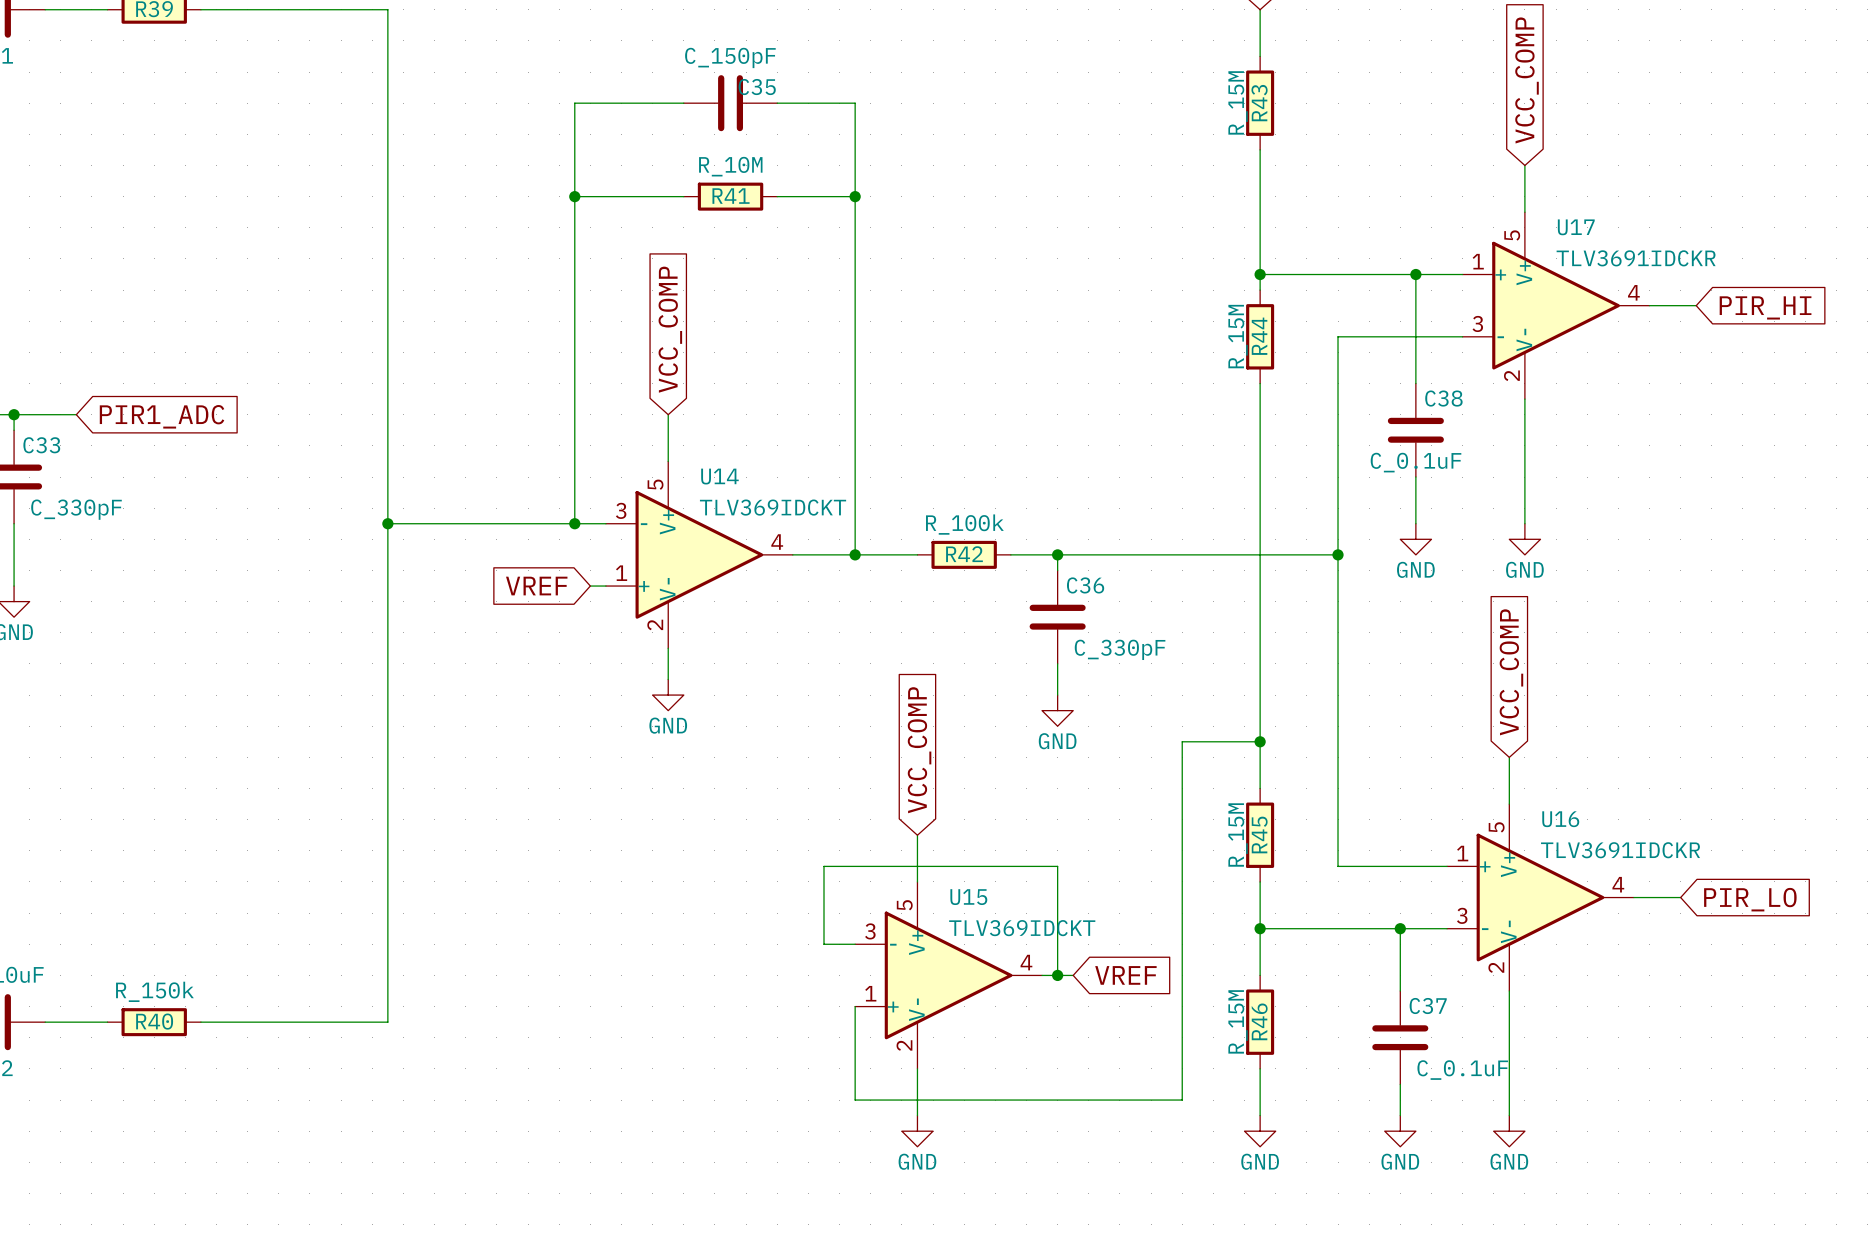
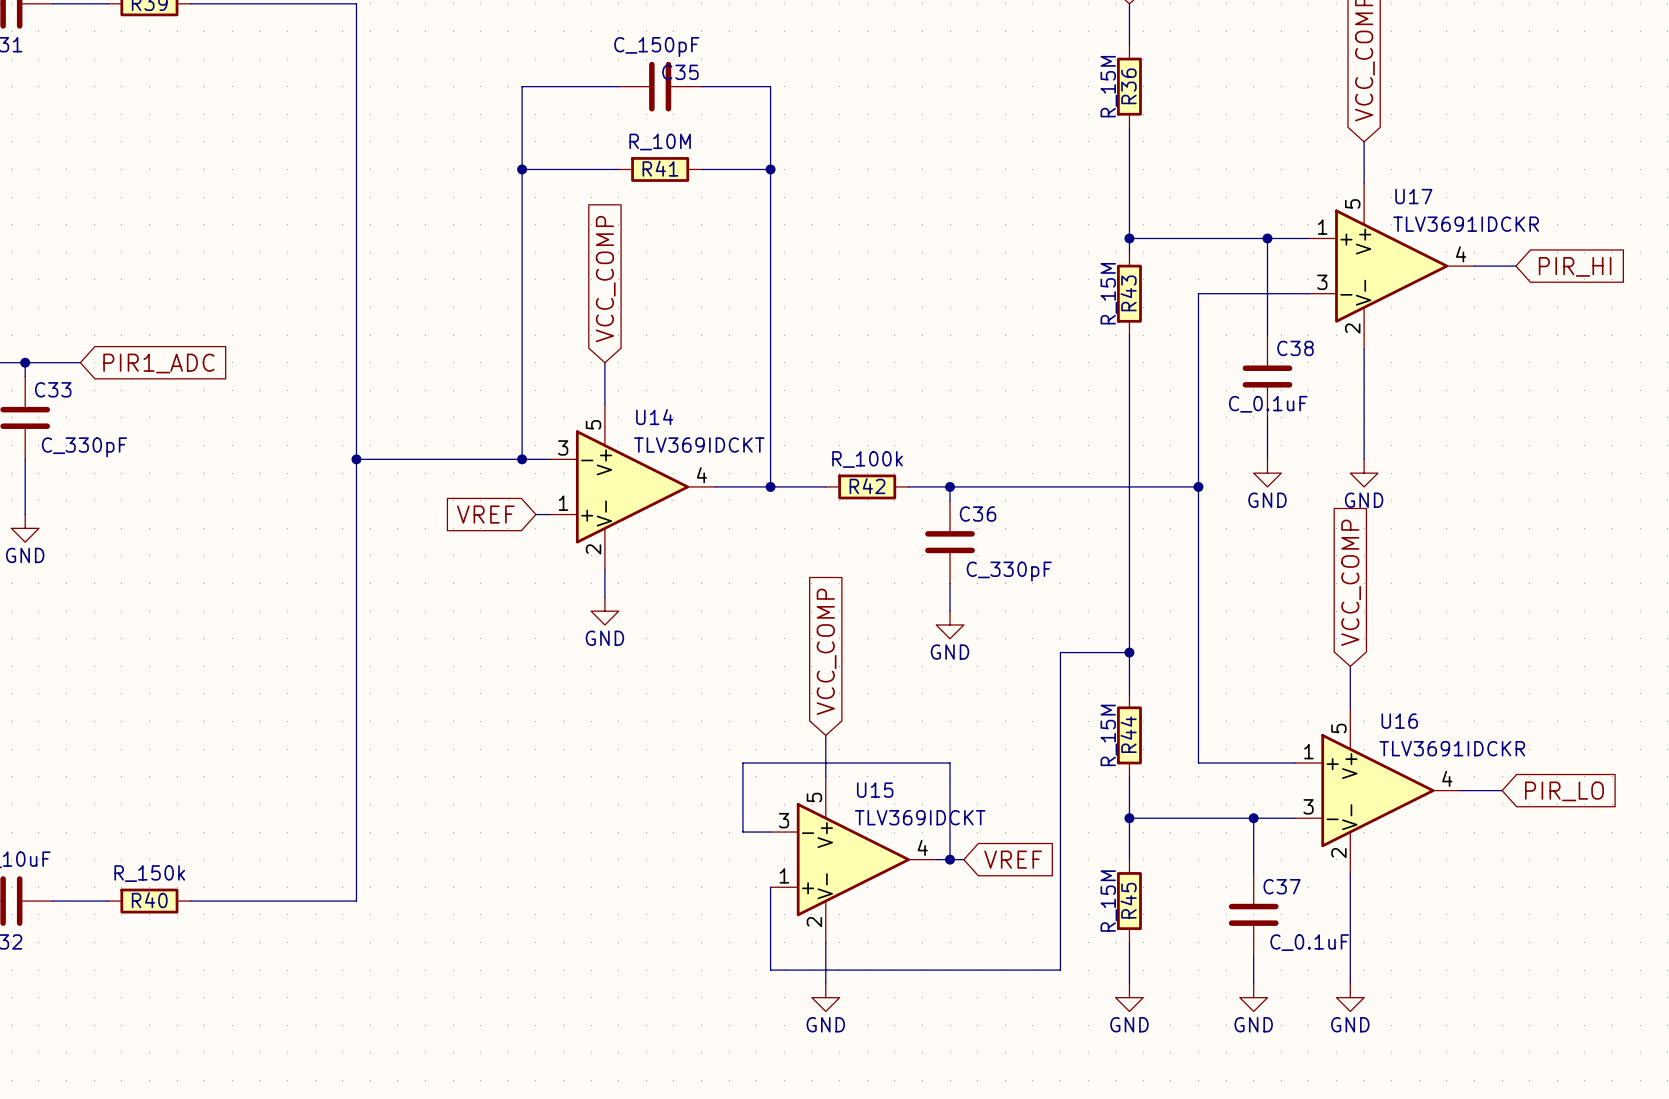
R43 name: R43 (1259, 103) -> R36 (1128, 86)
R44 name: R44 (1259, 336) -> R43 (1128, 293)
R45 name: R45 (1259, 834) -> R44 (1128, 734)
R46 name: R46 (1259, 1021) -> R45 (1128, 900)

